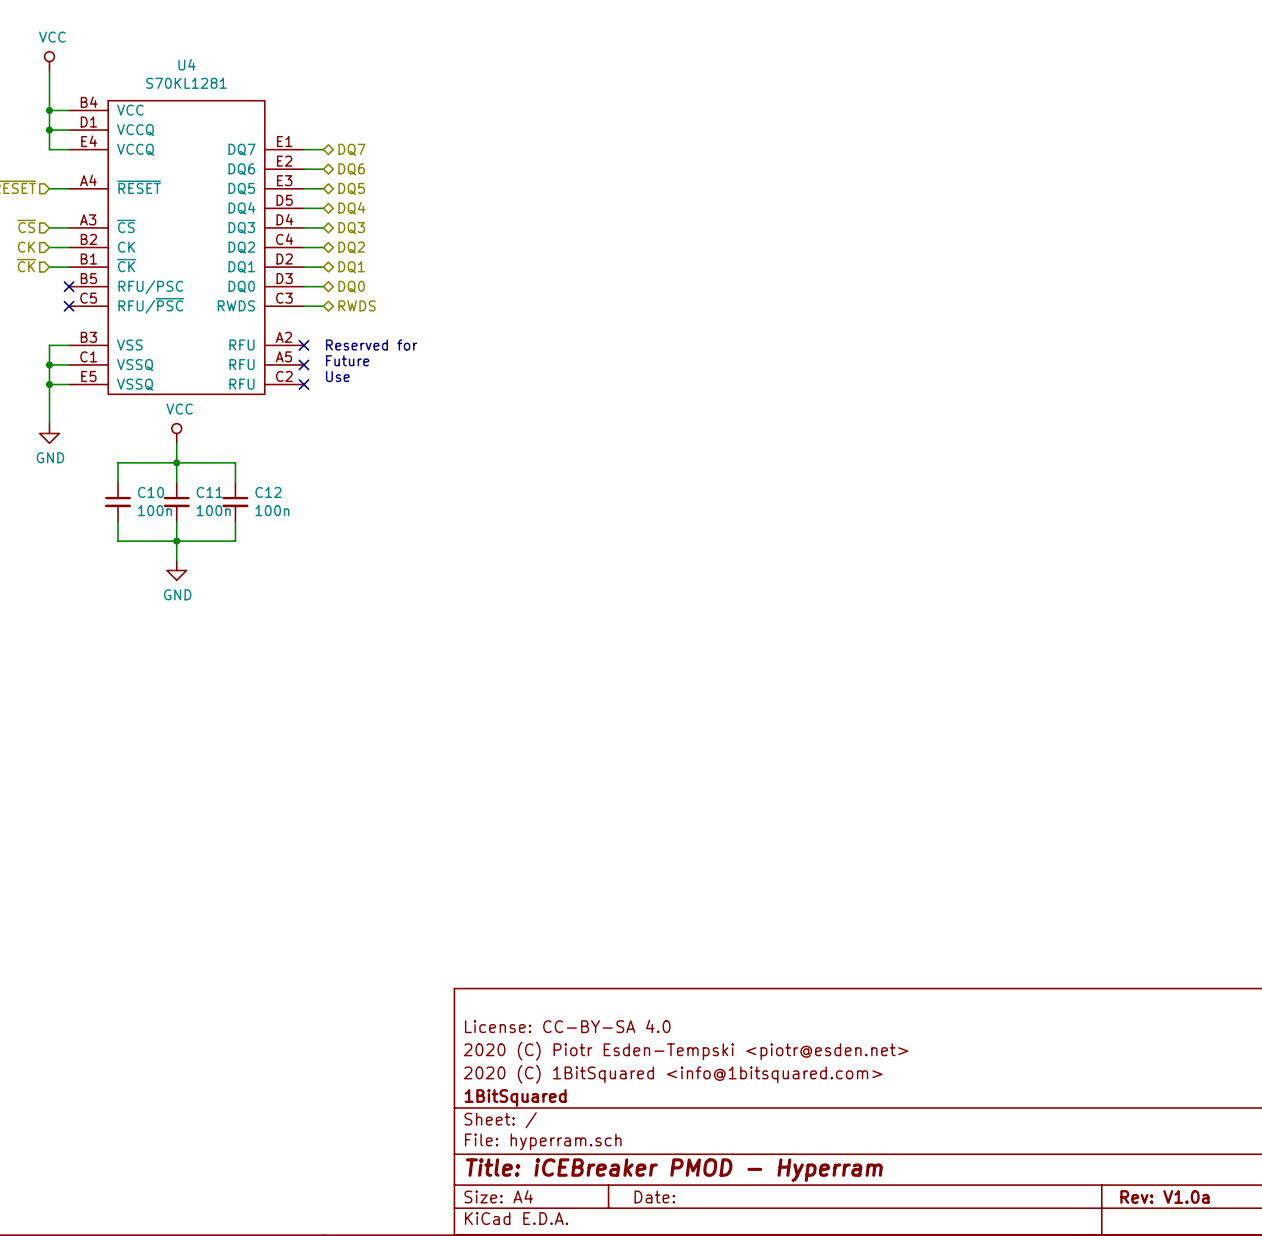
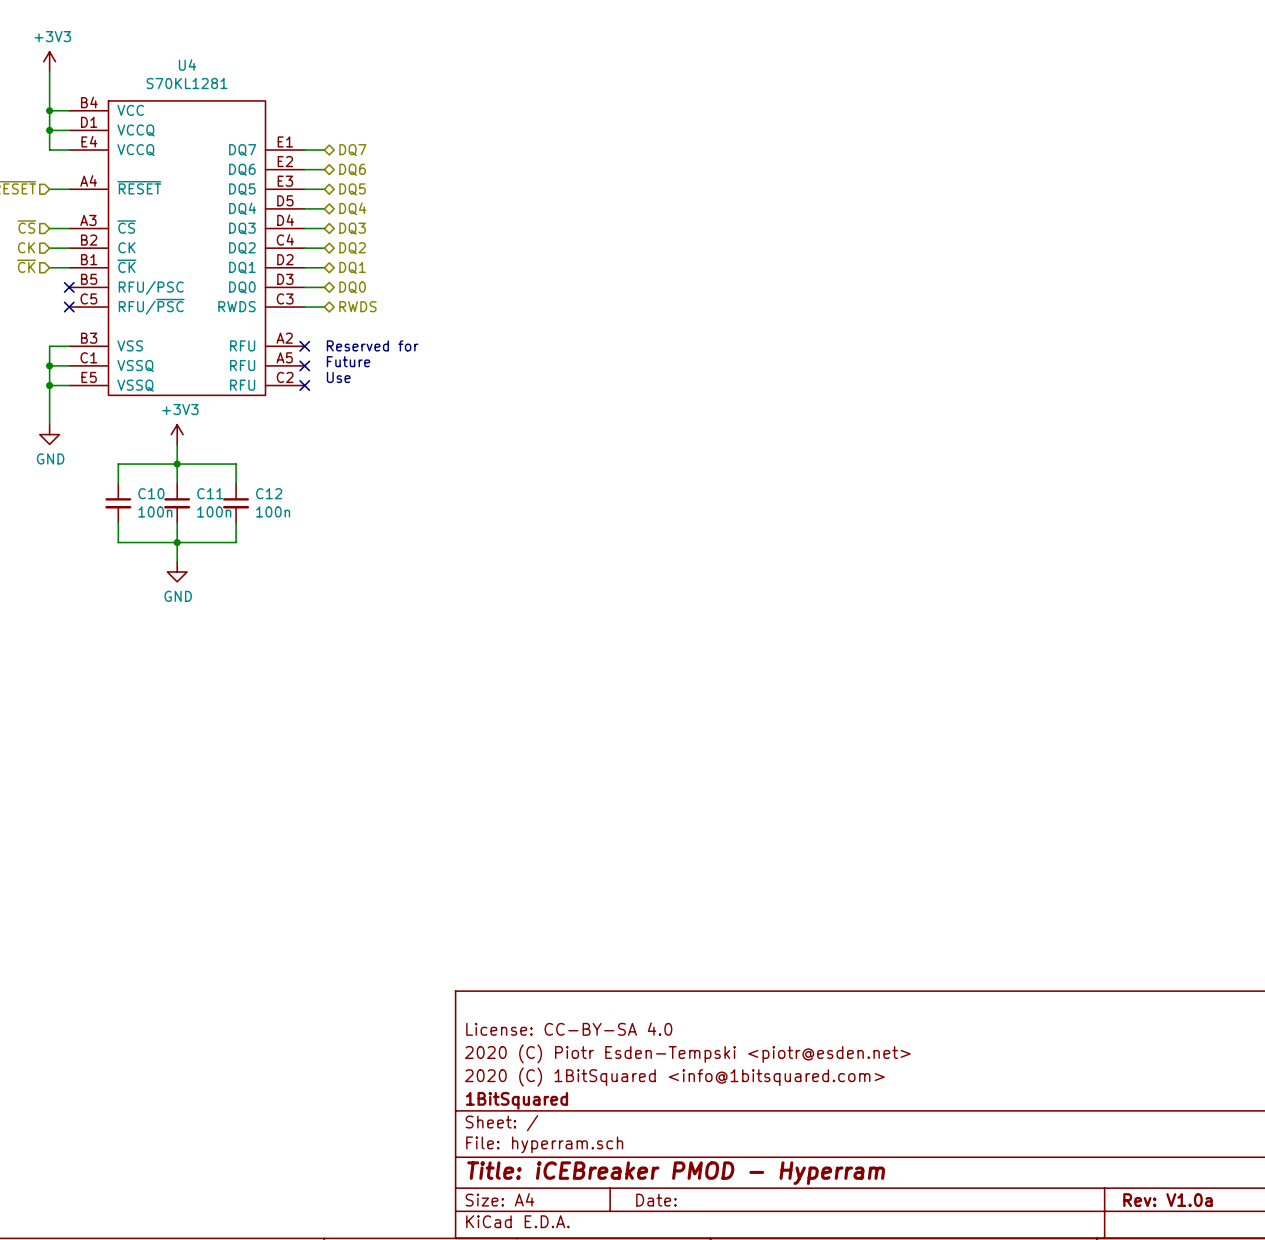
power symbol: VCC (49, 61) -> +3V3 (49, 61)
power symbol: VCC (176, 433) -> +3V3 (177, 434)

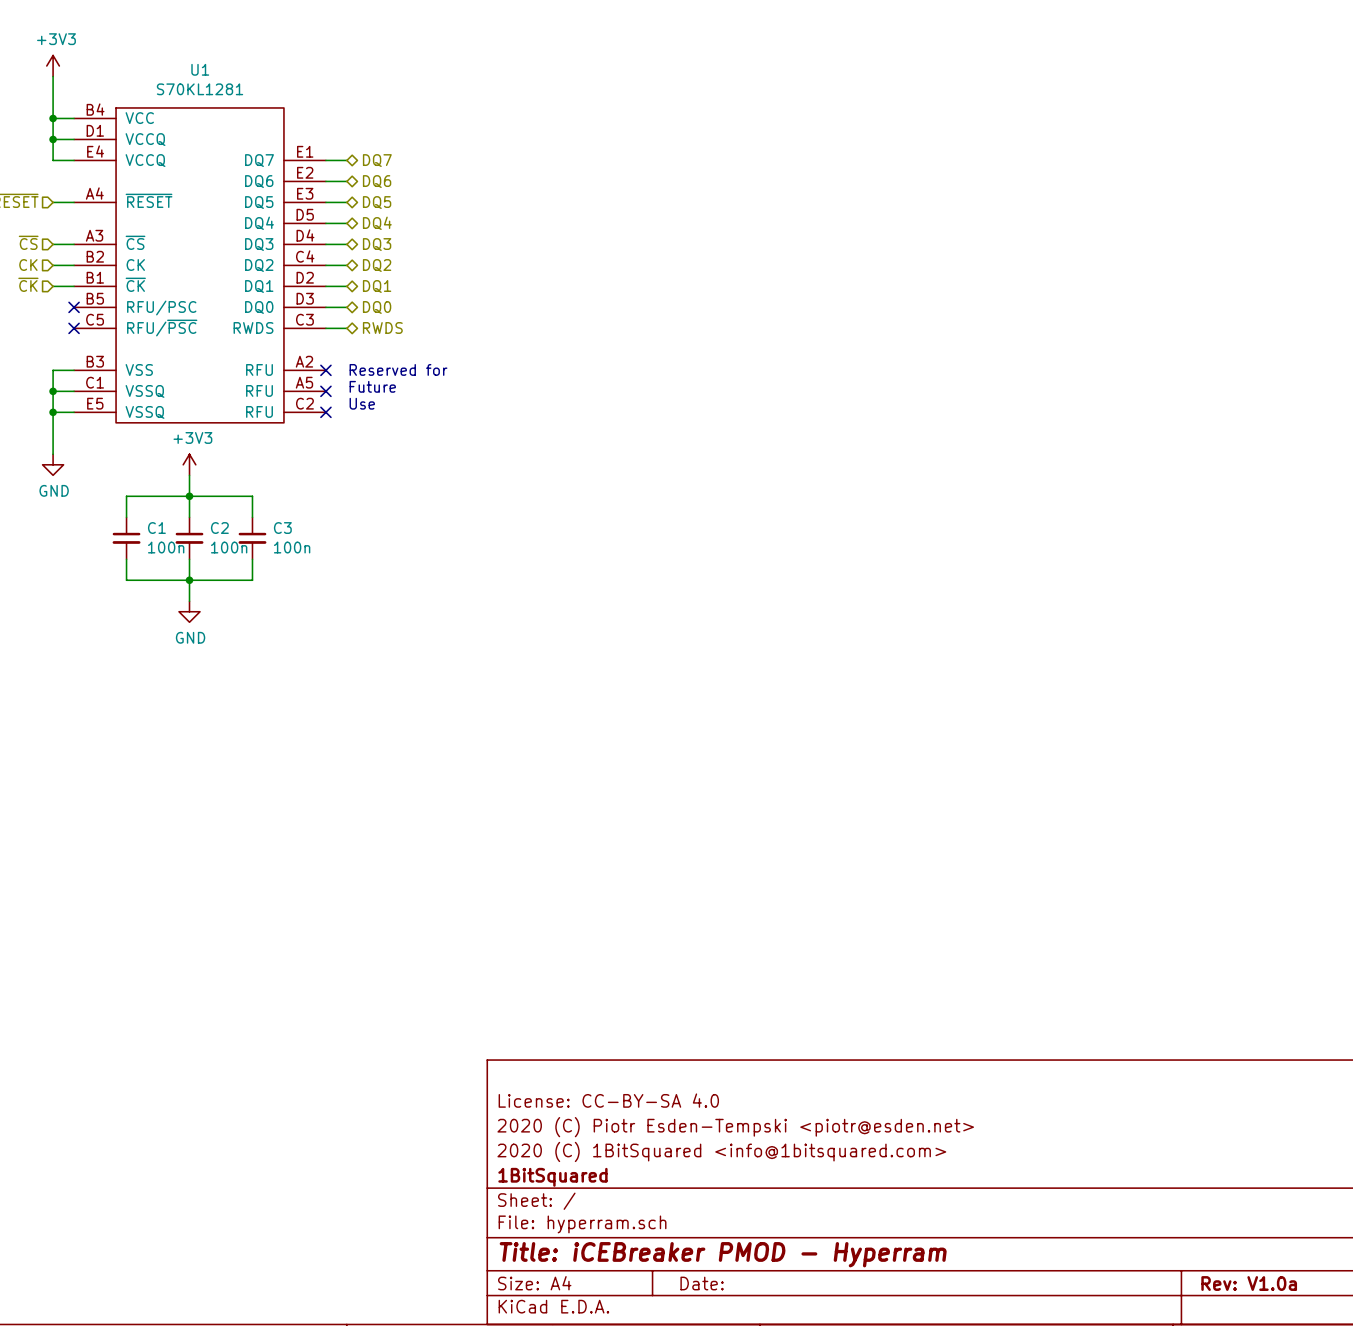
U4 name: U4 (187, 65) -> U1 (200, 69)
C10 name: C10 (151, 493) -> C1 (156, 528)
C11 name: C11 (210, 493) -> C2 (219, 528)
C12 name: C12 (269, 493) -> C3 (282, 528)

